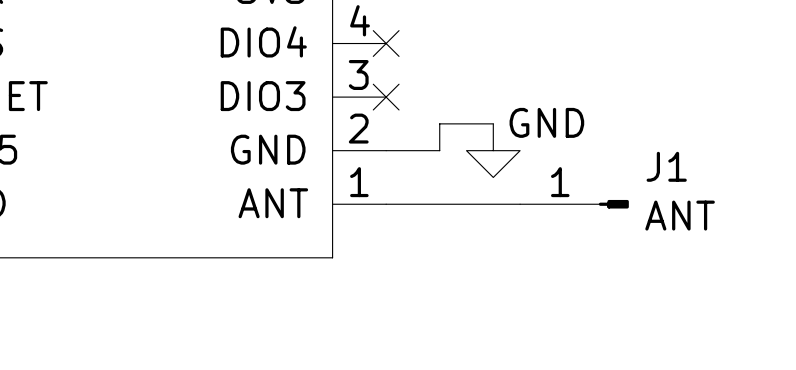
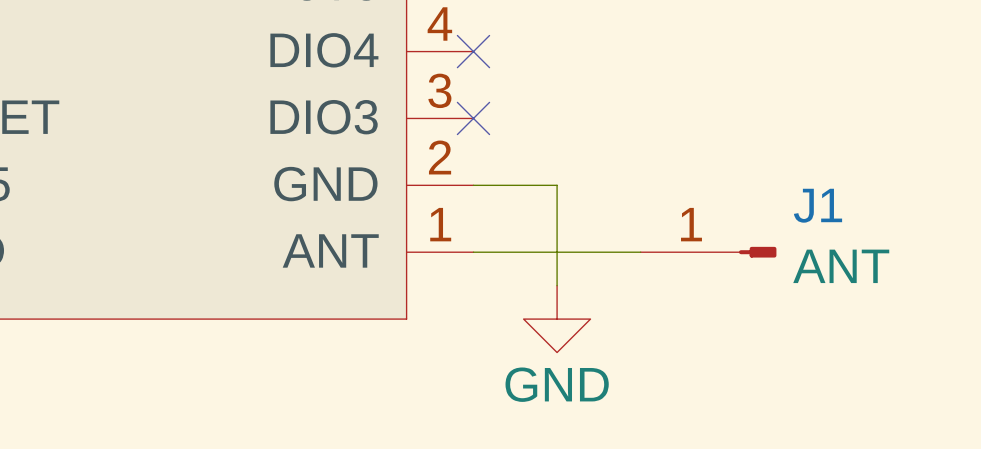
power symbol text position: GND (546, 122) -> GND (557, 384)
wire: (493, 123) (439, 123) (439, 150) -> (557, 285) (557, 185) (540, 185)
power symbol position: GND (493, 150) -> GND (557, 319)

